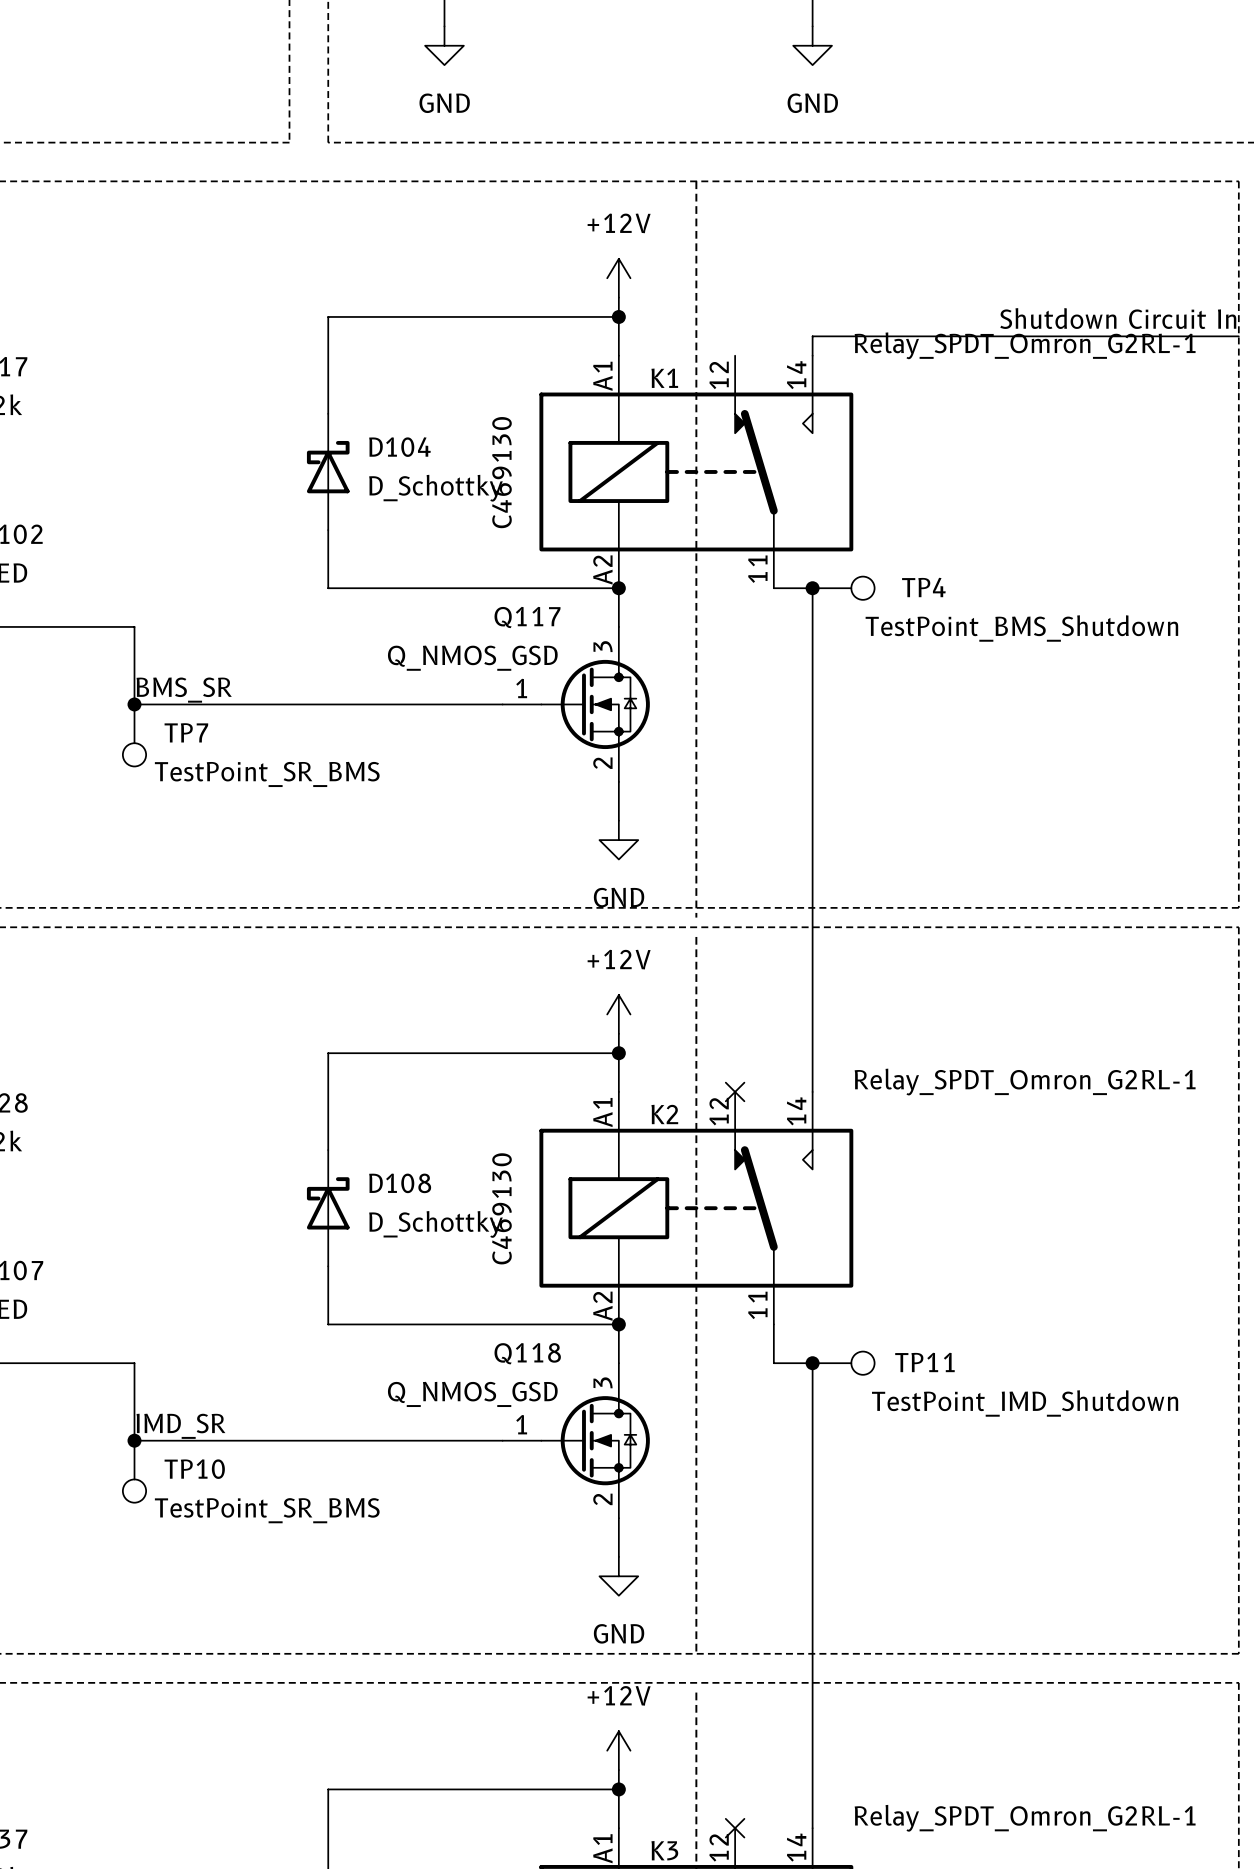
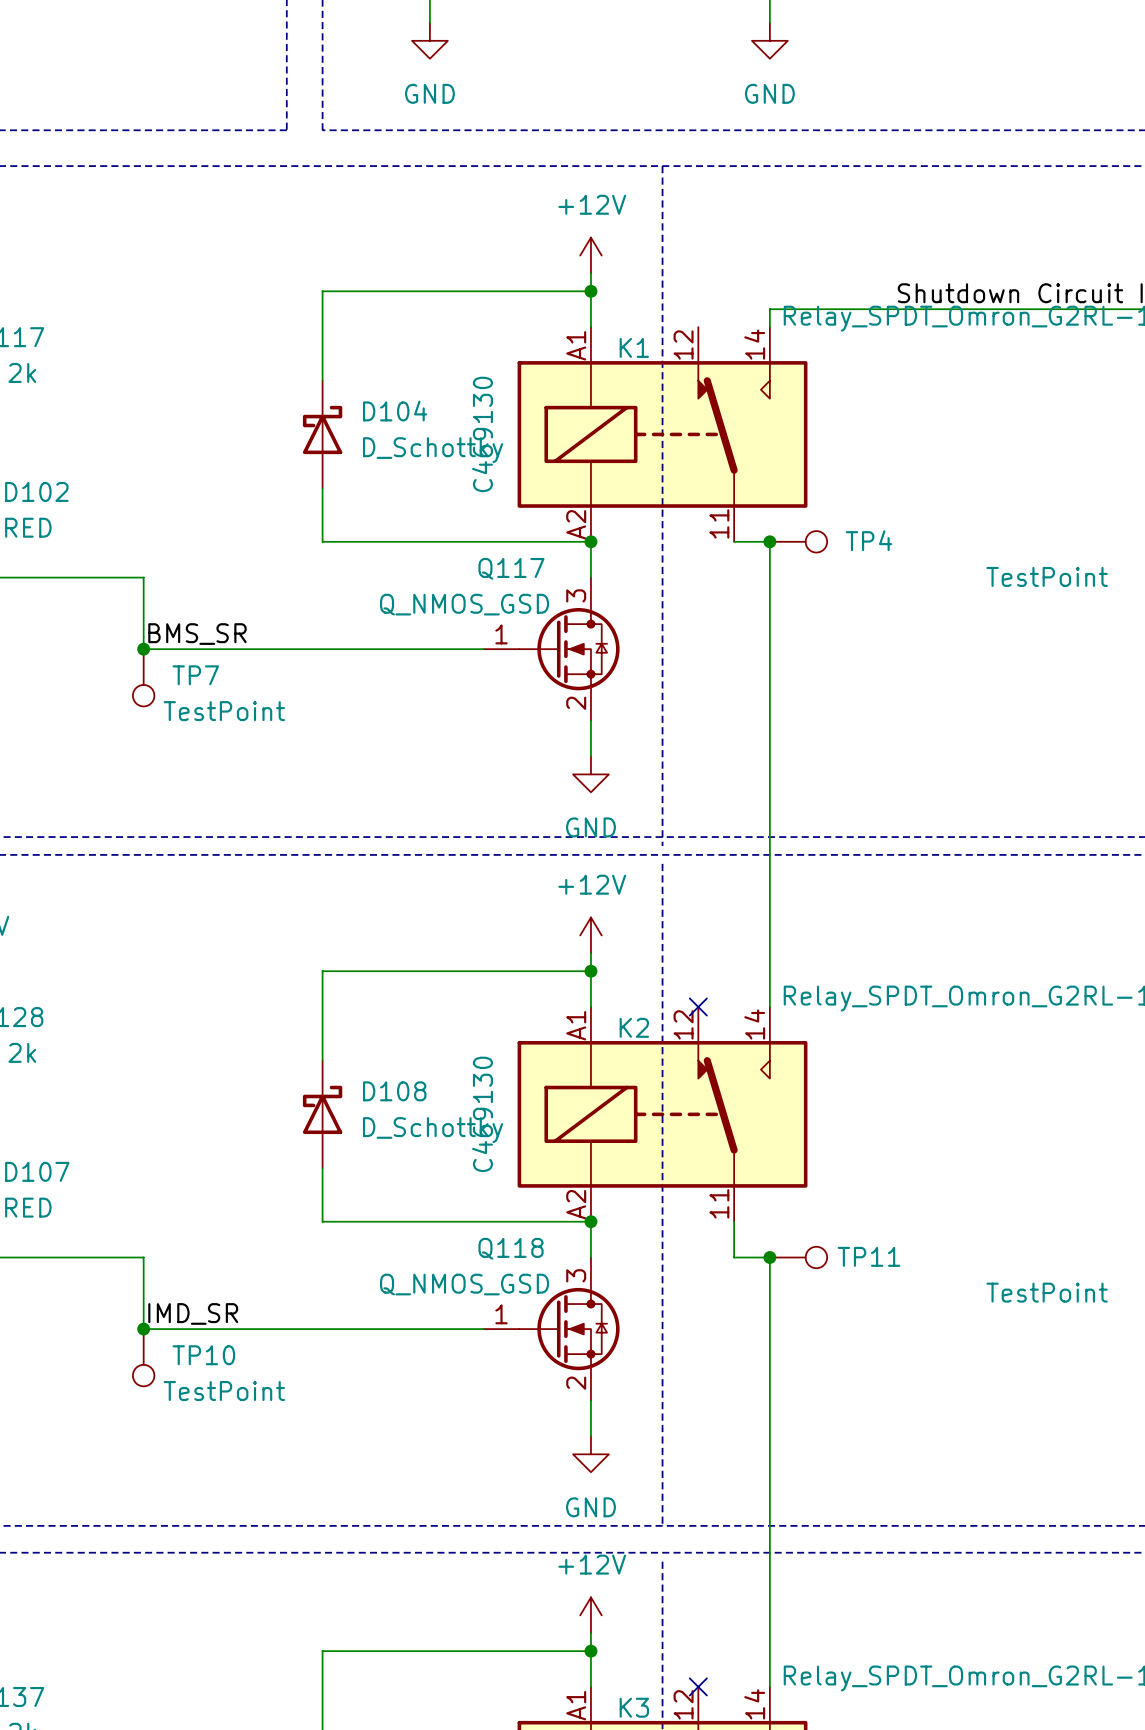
TP4 value: TestPoint_BMS_Shutdown (1021, 628) -> TestPoint (1047, 576)
TP7 value: TestPoint_SR_BMS (267, 774) -> TestPoint (224, 711)
TP11 value: TestPoint_IMD_Shutdown (1025, 1403) -> TestPoint (1047, 1292)
TP10 value: TestPoint_SR_BMS (267, 1510) -> TestPoint (224, 1391)

